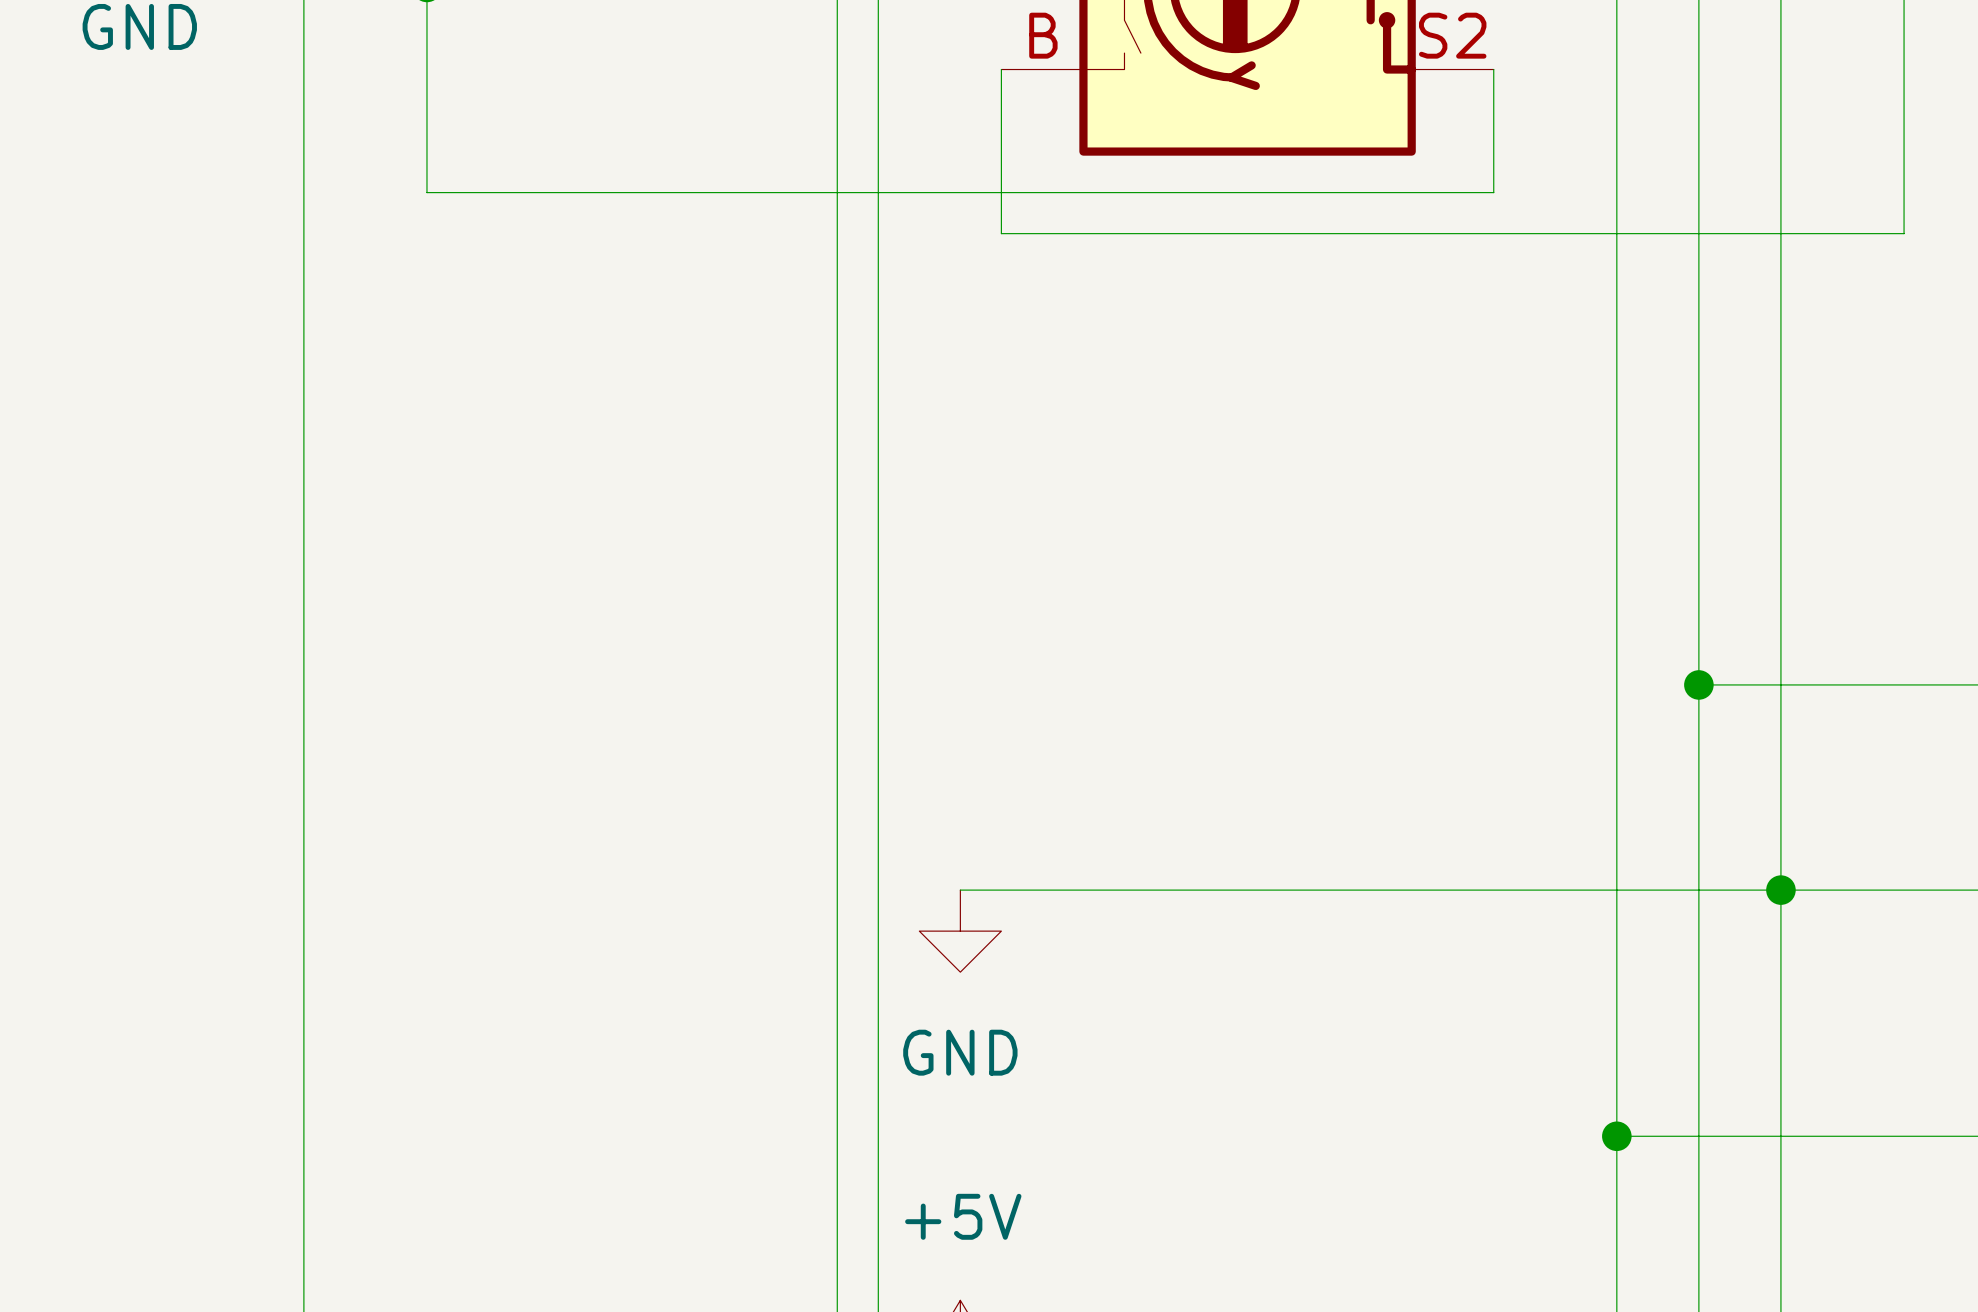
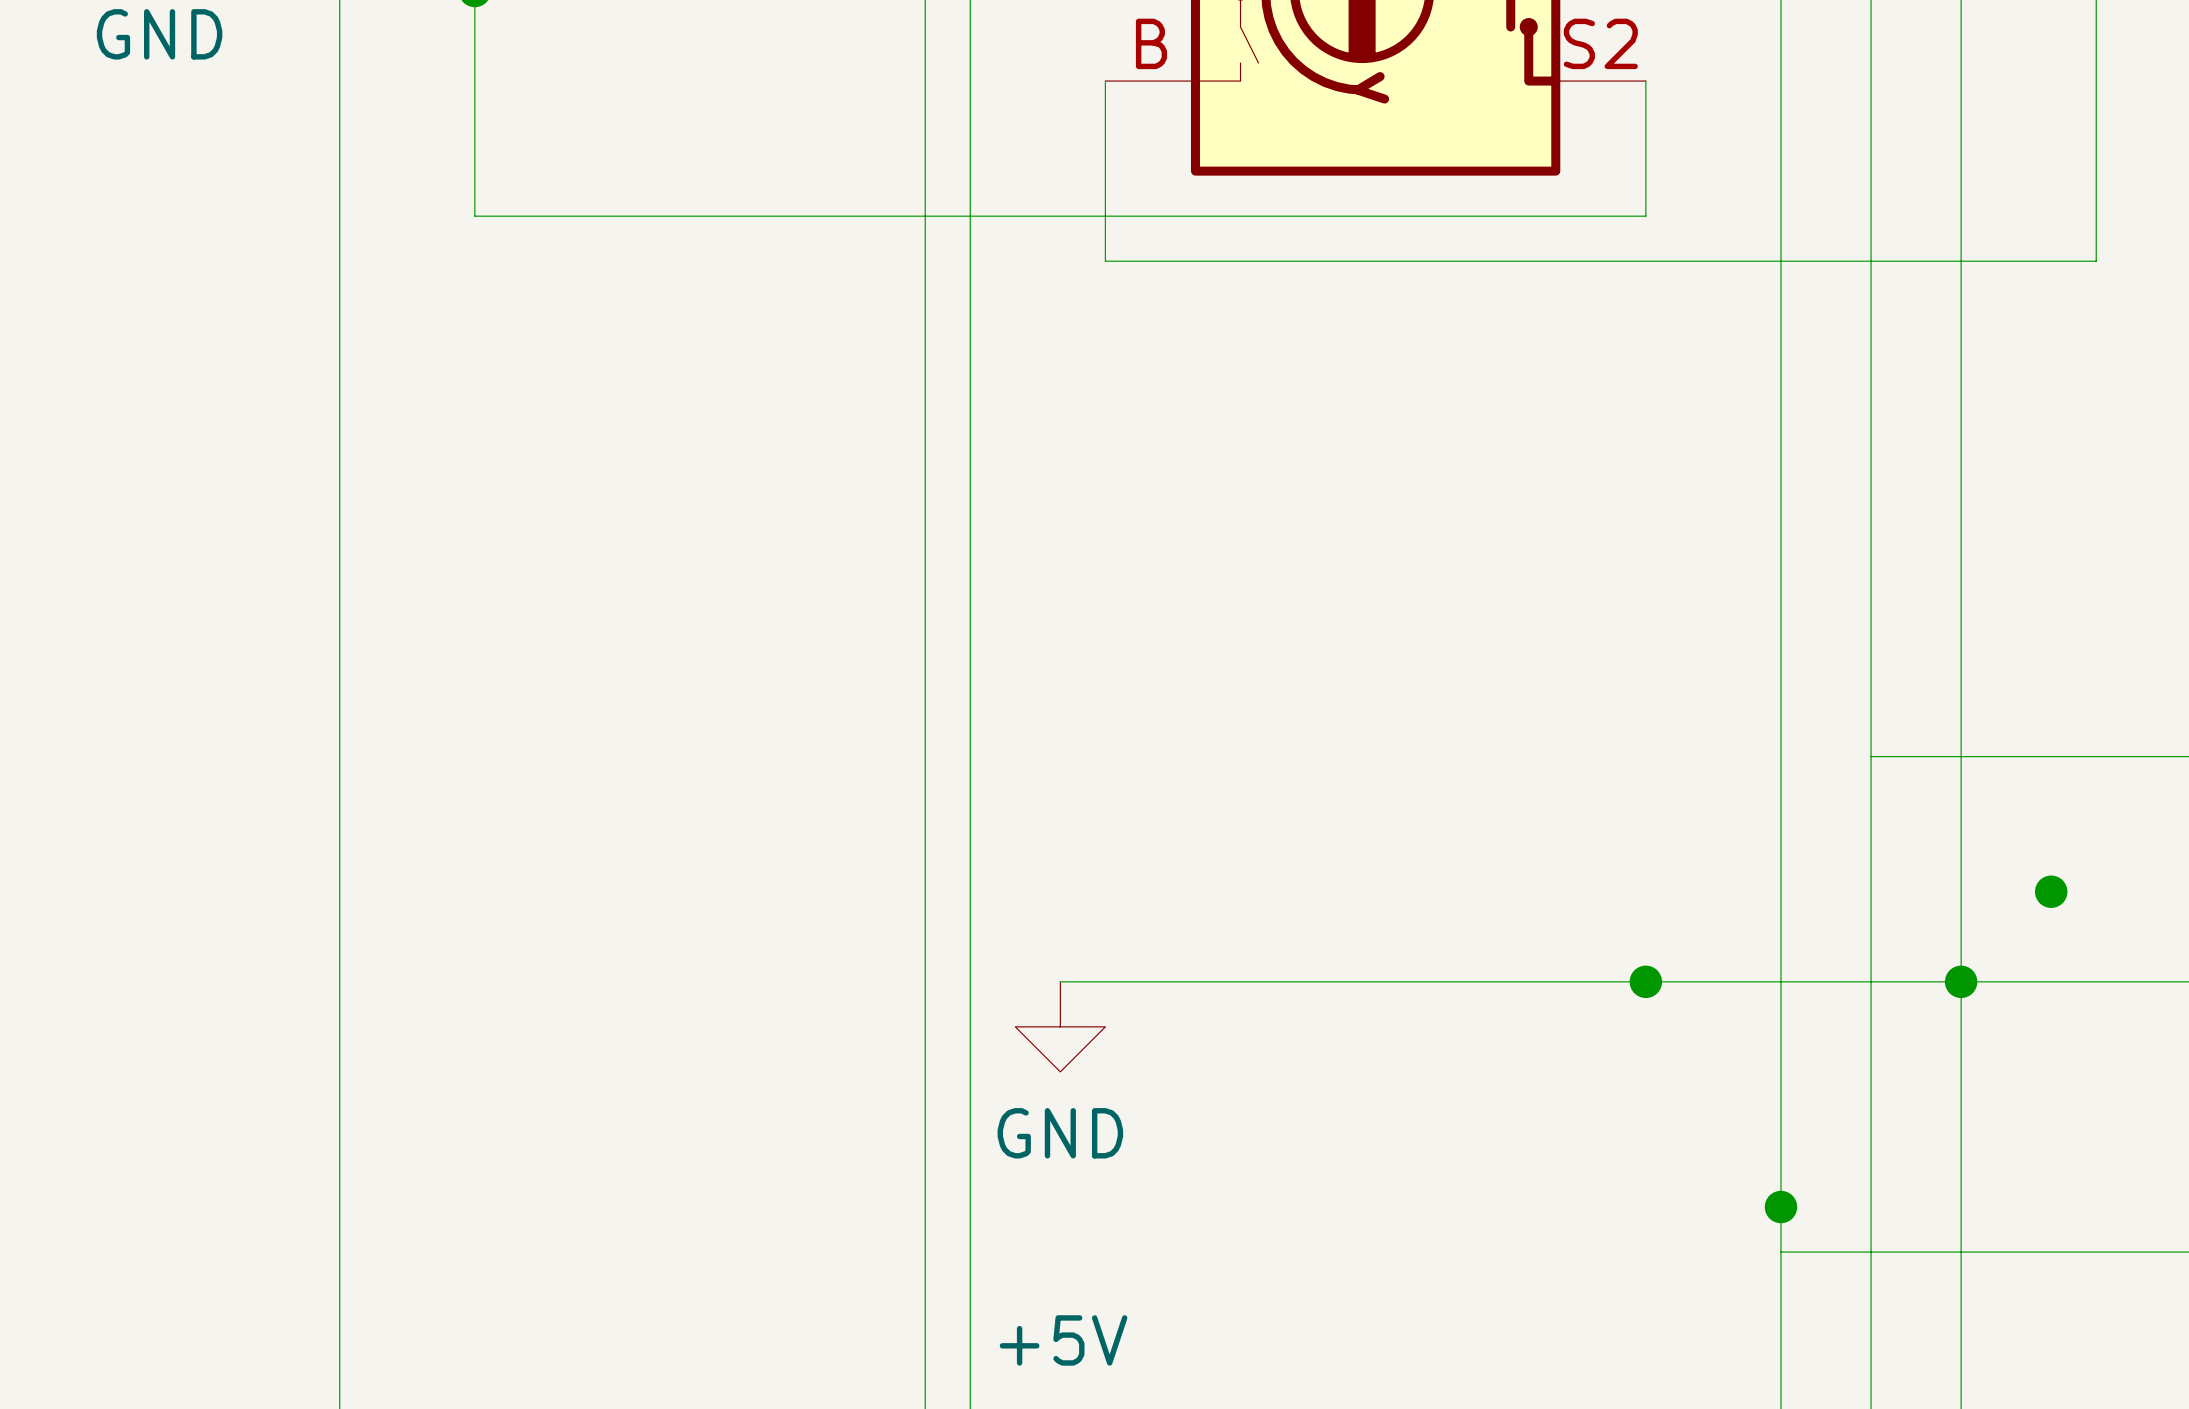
junction: (1698, 684) -> none
junction: none -> (2051, 891)
junction: none -> (1645, 981)
power symbol text position: GND (960, 1052) -> GND (1060, 1133)
junction position: (1616, 1136) -> (1780, 1207)

